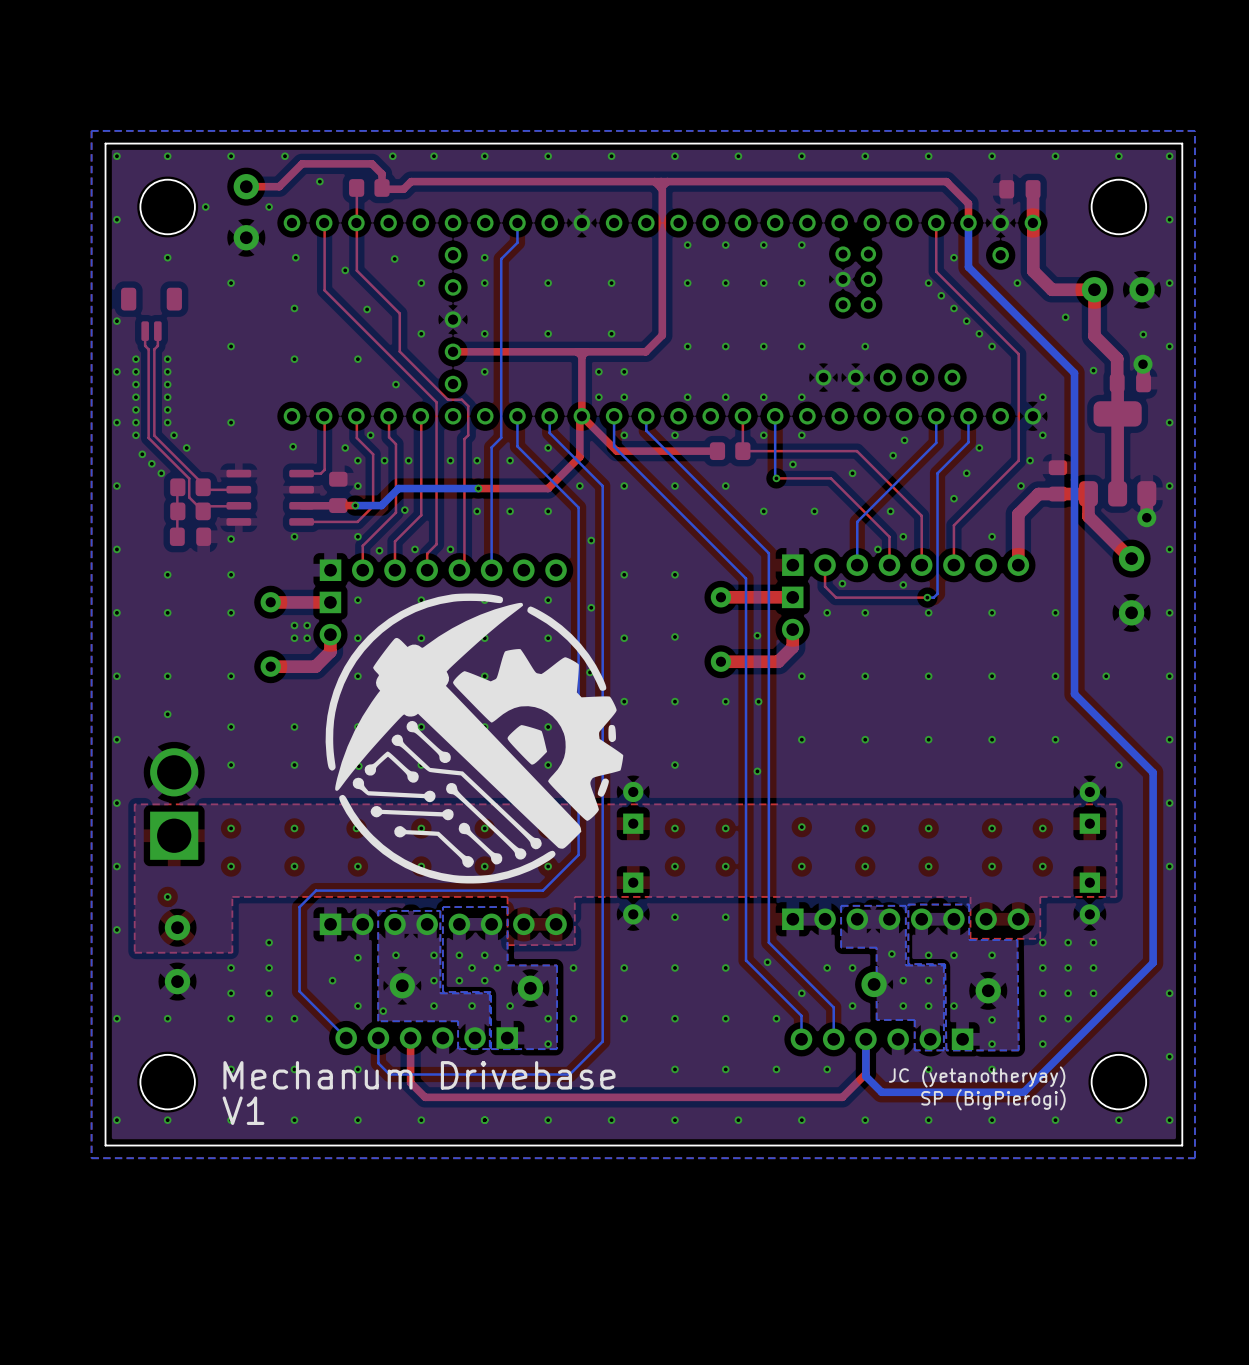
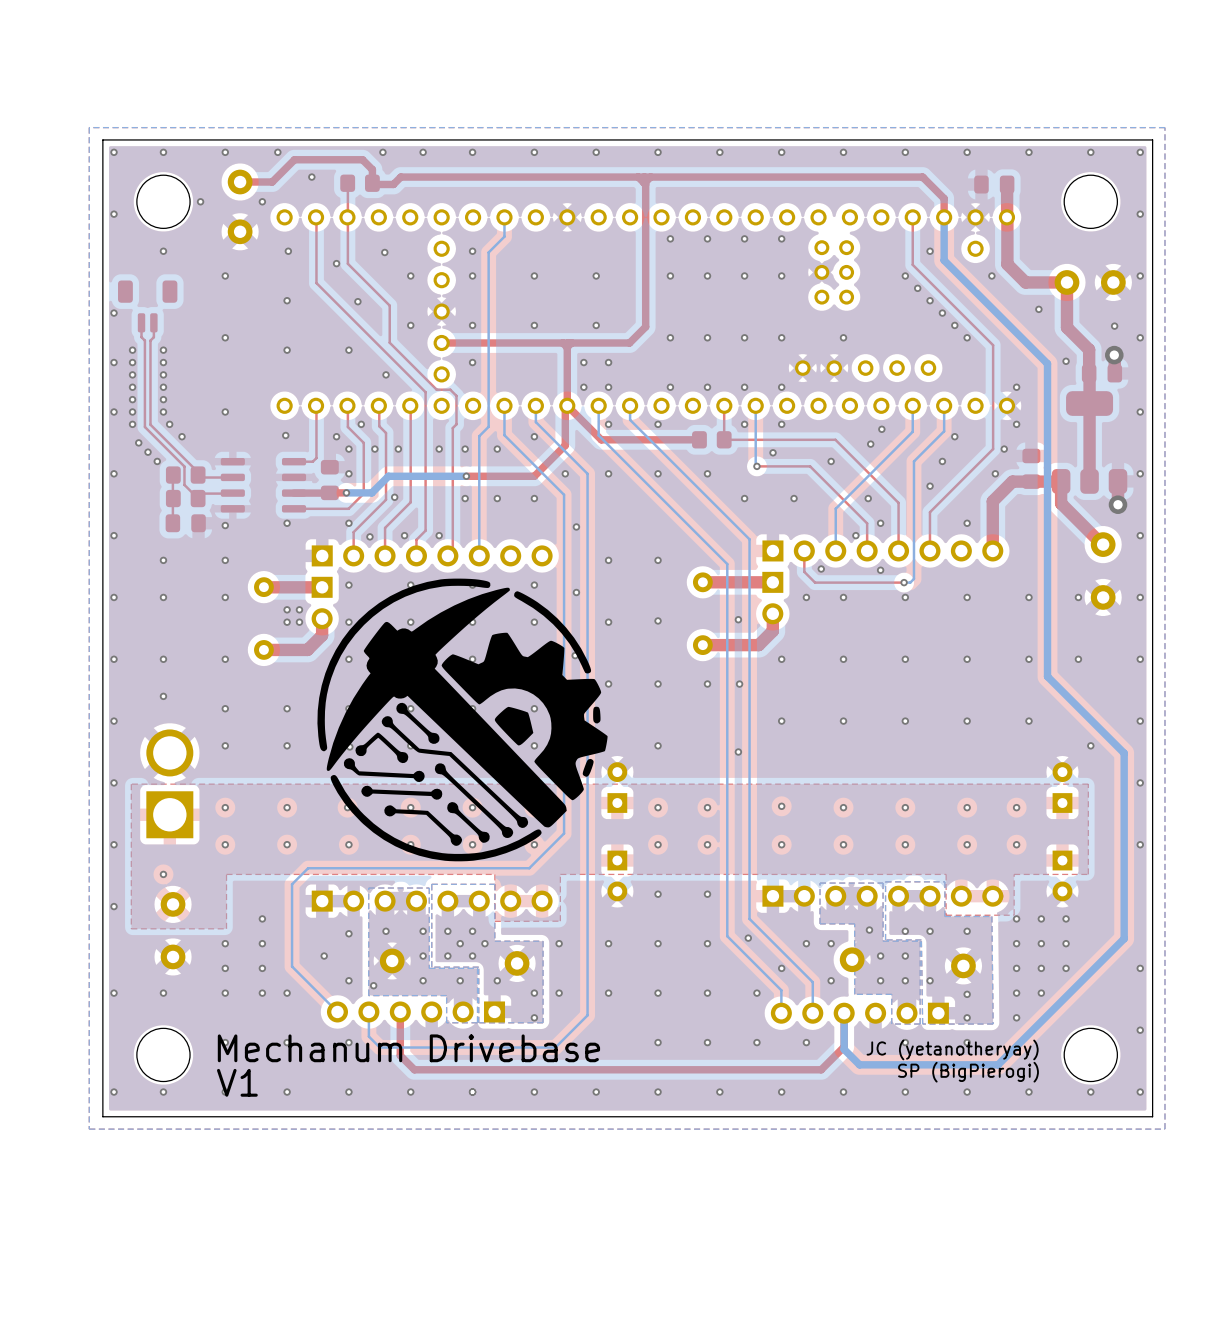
via: none -> (1078, 597)

